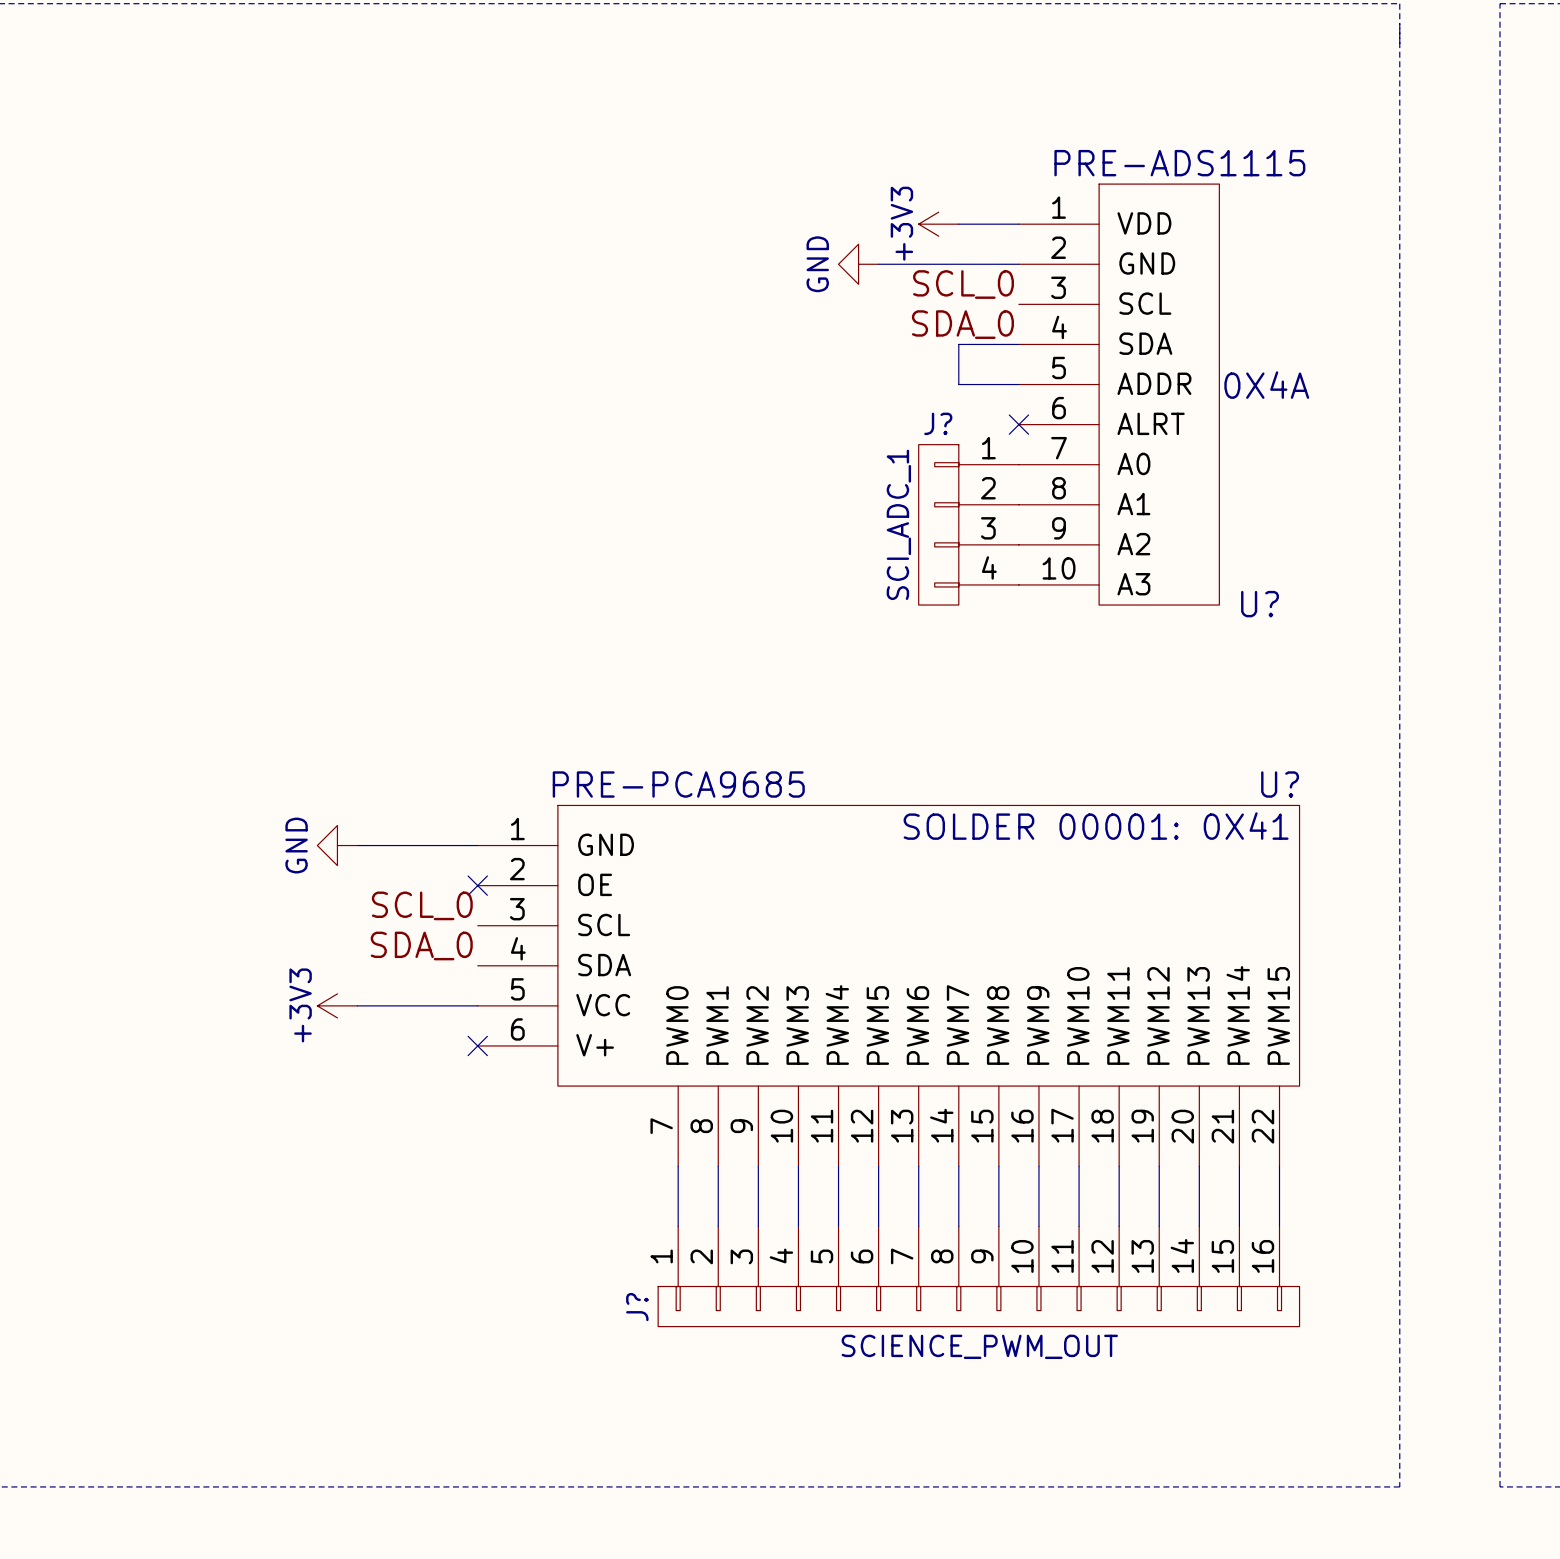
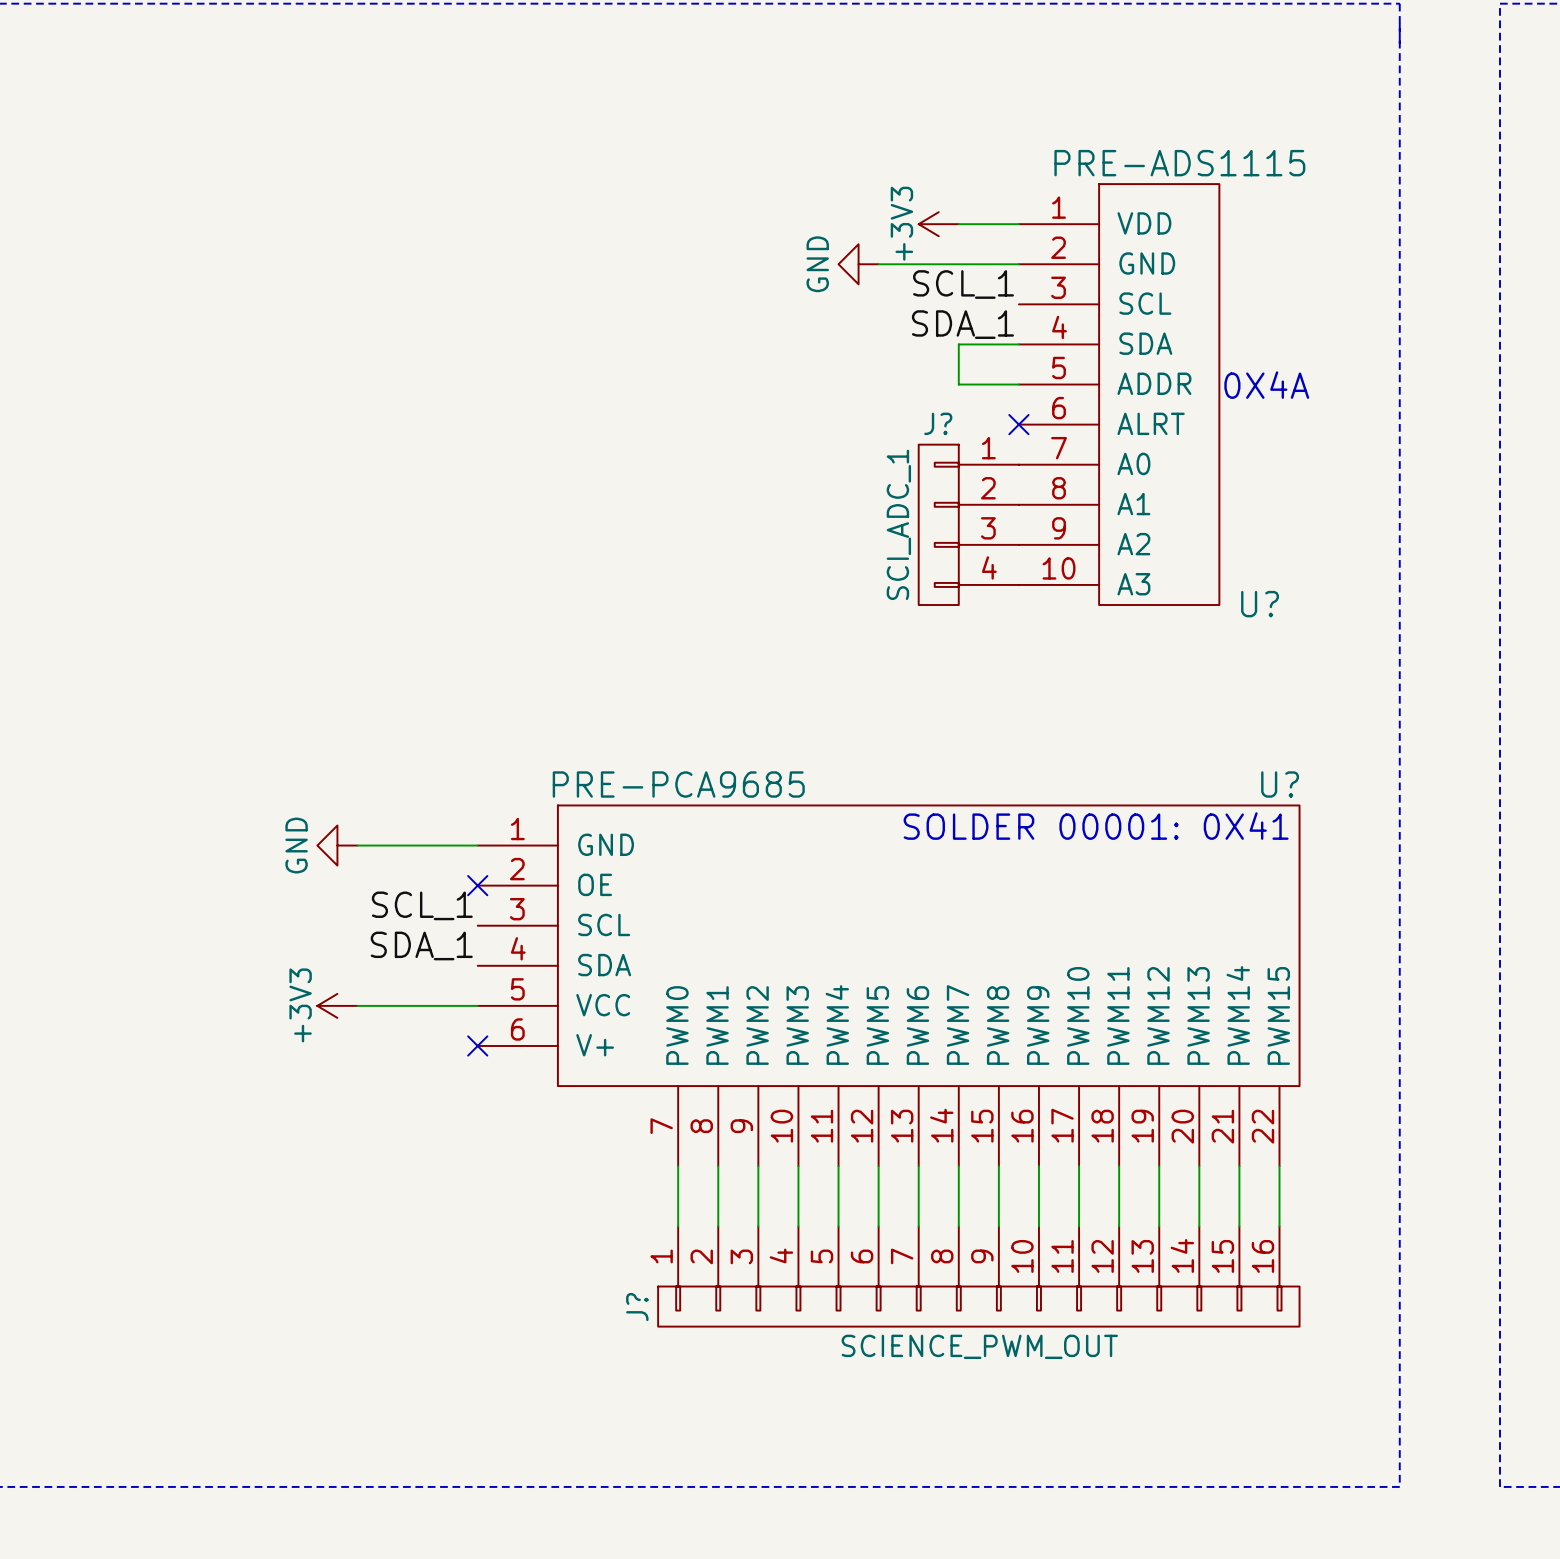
label: SCL_0 (963, 284) -> SCL_1 (963, 284)
label: SDA_0 (962, 324) -> SDA_1 (962, 324)
label: SCL_0 (422, 905) -> SCL_1 (422, 905)
label: SDA_0 (421, 945) -> SDA_1 (421, 945)

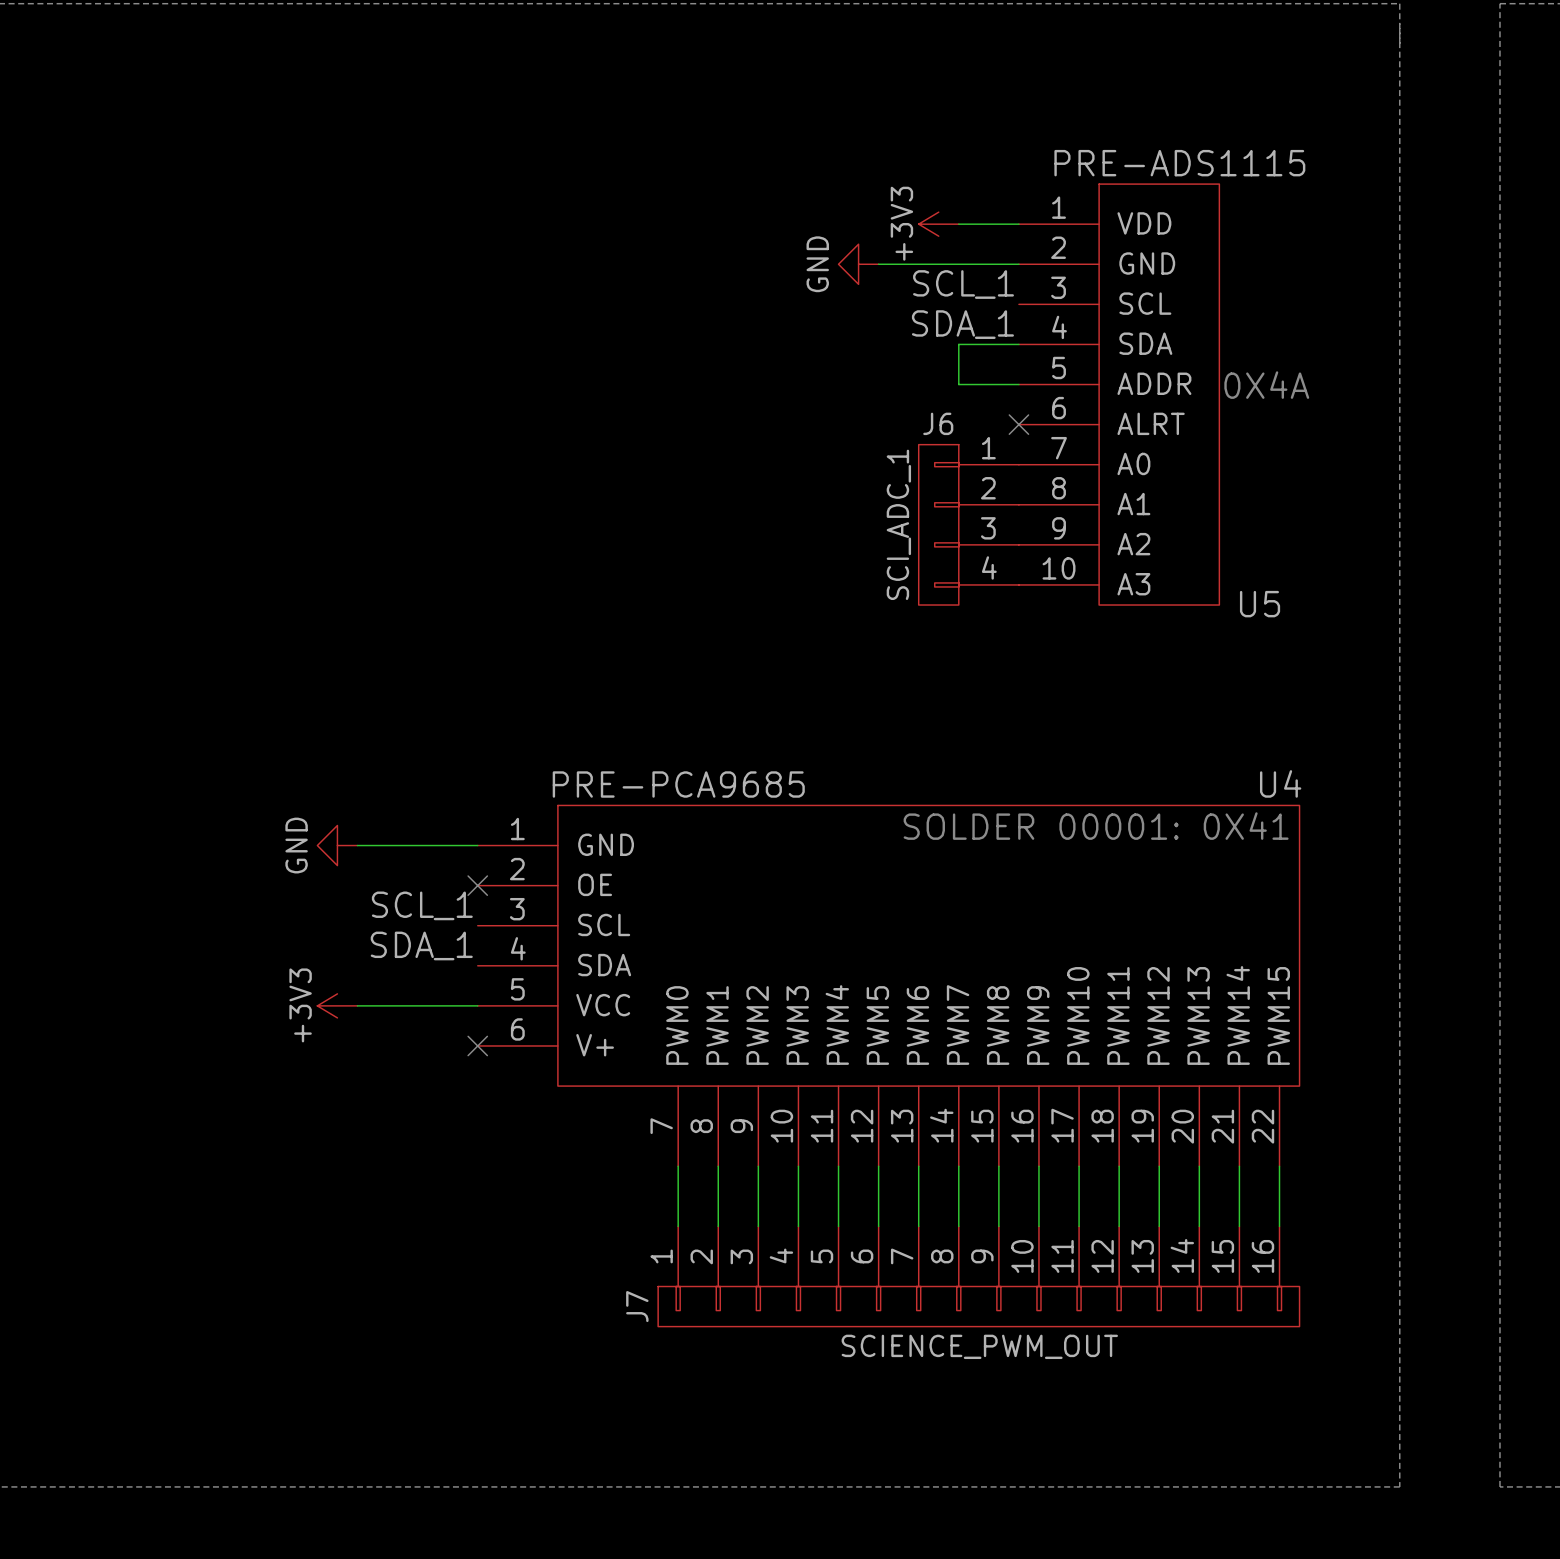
J? name: J? (938, 423) -> J6 (938, 423)
U? name: U? (1260, 604) -> U5 (1260, 604)
U? name: U? (1280, 784) -> U4 (1280, 783)
J? name: J? (637, 1307) -> J7 (637, 1306)

